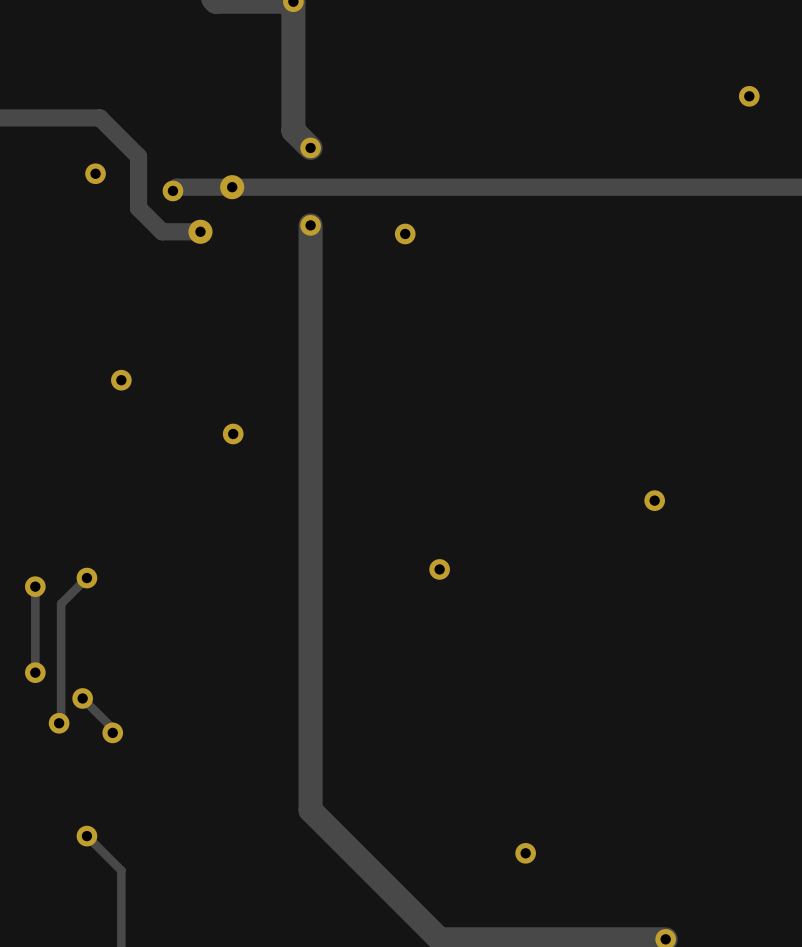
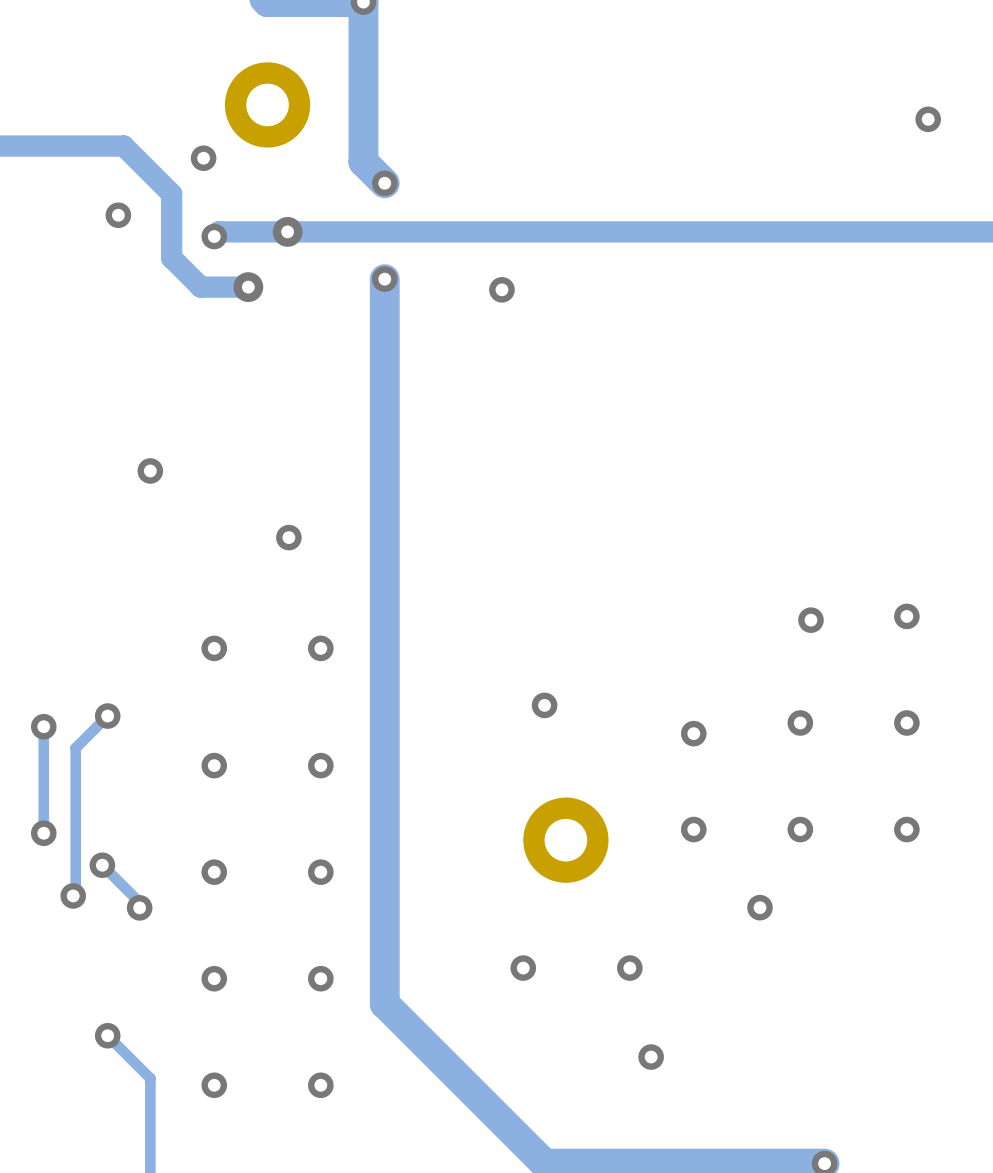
part: none -> (267, 104)
via: none -> (203, 158)
via: none -> (906, 616)
via: none -> (214, 648)
via: none -> (320, 648)
via: none -> (800, 722)
via: none -> (906, 722)
via: none -> (693, 733)
via: none -> (214, 765)
via: none -> (320, 765)
via: none -> (693, 829)
via: none -> (800, 829)
via: none -> (906, 829)
part: none -> (565, 840)
via: none -> (214, 872)
via: none -> (320, 872)
via: none -> (760, 907)
via: none -> (523, 968)
via: none -> (629, 968)
via: none -> (214, 978)
via: none -> (320, 978)
via: none -> (214, 1085)
via: none -> (320, 1085)

